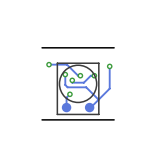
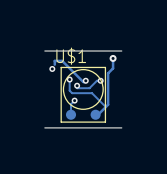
U$1 name: none -> U$1 (71, 56)
track: none -> (113, 58) (113, 68) (108, 73) (108, 104) (96, 115)
via: none -> (113, 58)
track: none -> (54, 64) (54, 60) (62, 60) (83, 82) (85, 82)
track: (49, 64) (67, 64) (80, 75) -> none
track: (109, 66) (109, 88) (89, 107) -> none
via: (109, 66) -> none

